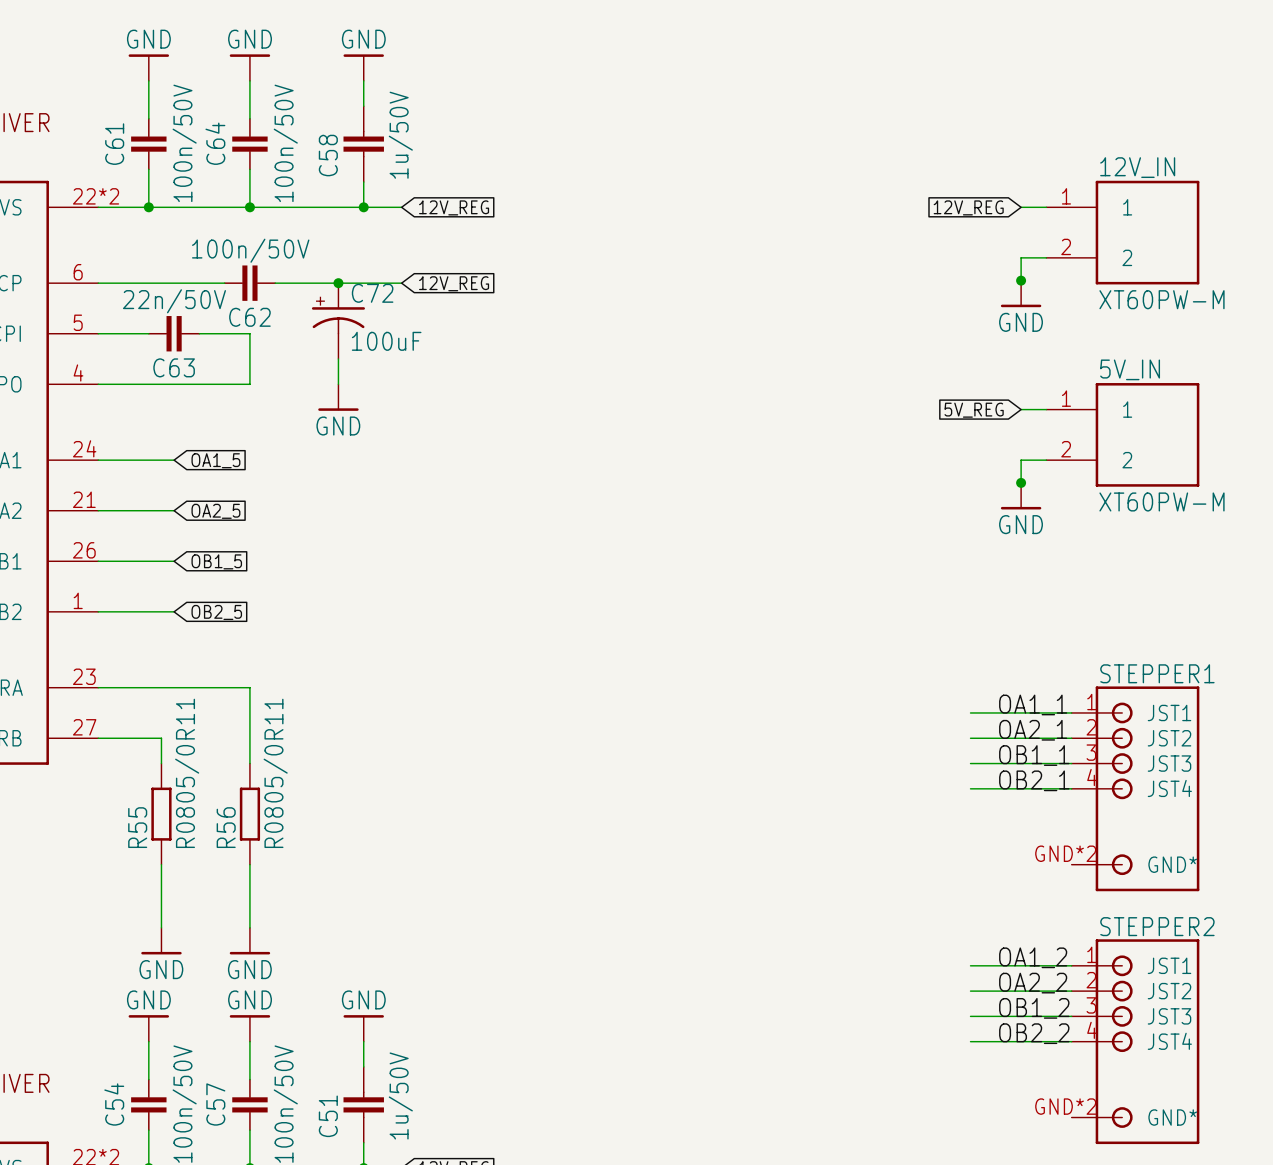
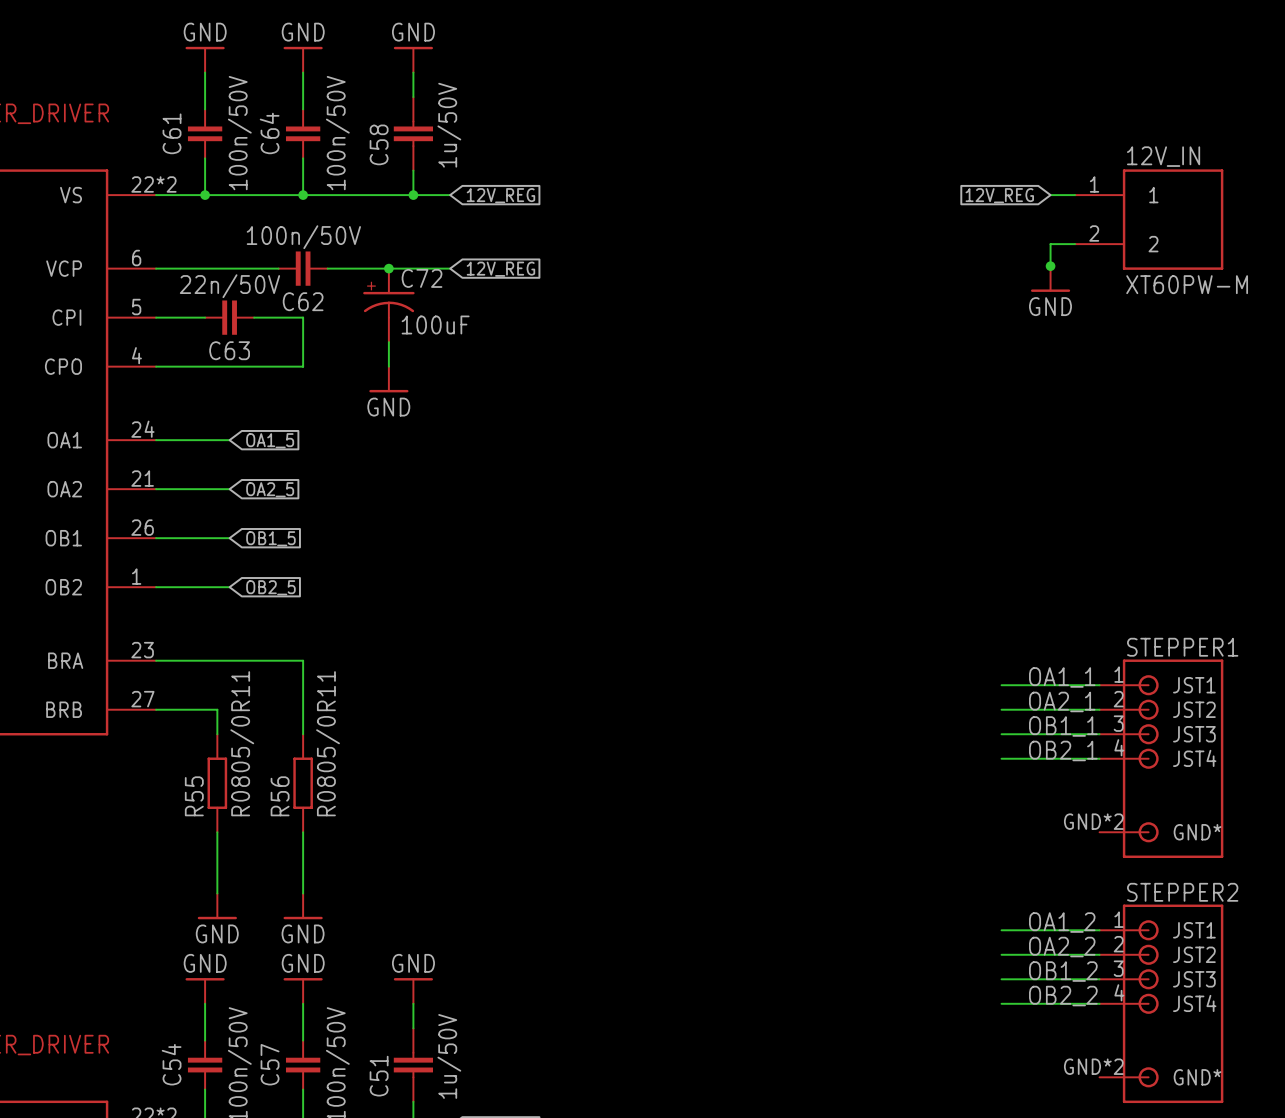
wire: (1021, 409) (1046, 409) -> none
global label: 5V_REG (974, 410) -> none
5V_IN: XT60PW-M (1122, 434) -> none
wire: (1046, 460) (1021, 460) (1021, 485) -> none
junction: (1021, 482) -> none
power symbol: GND (1021, 496) -> none

